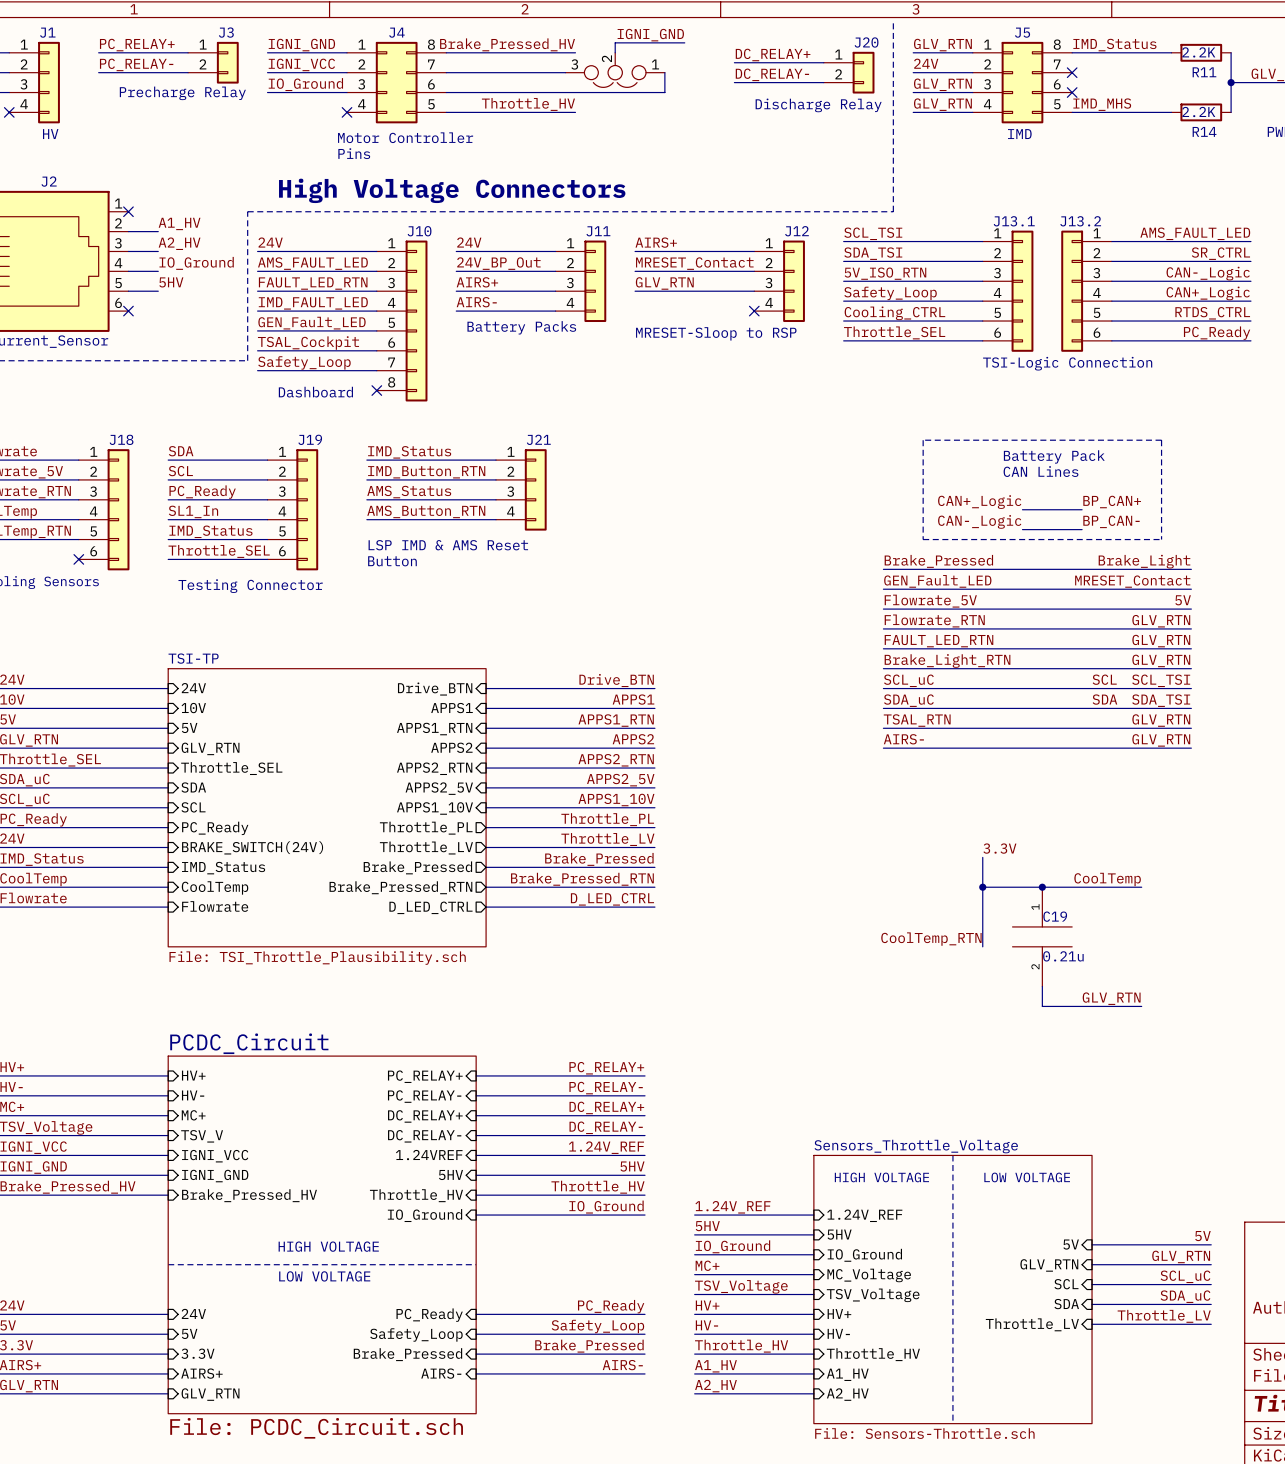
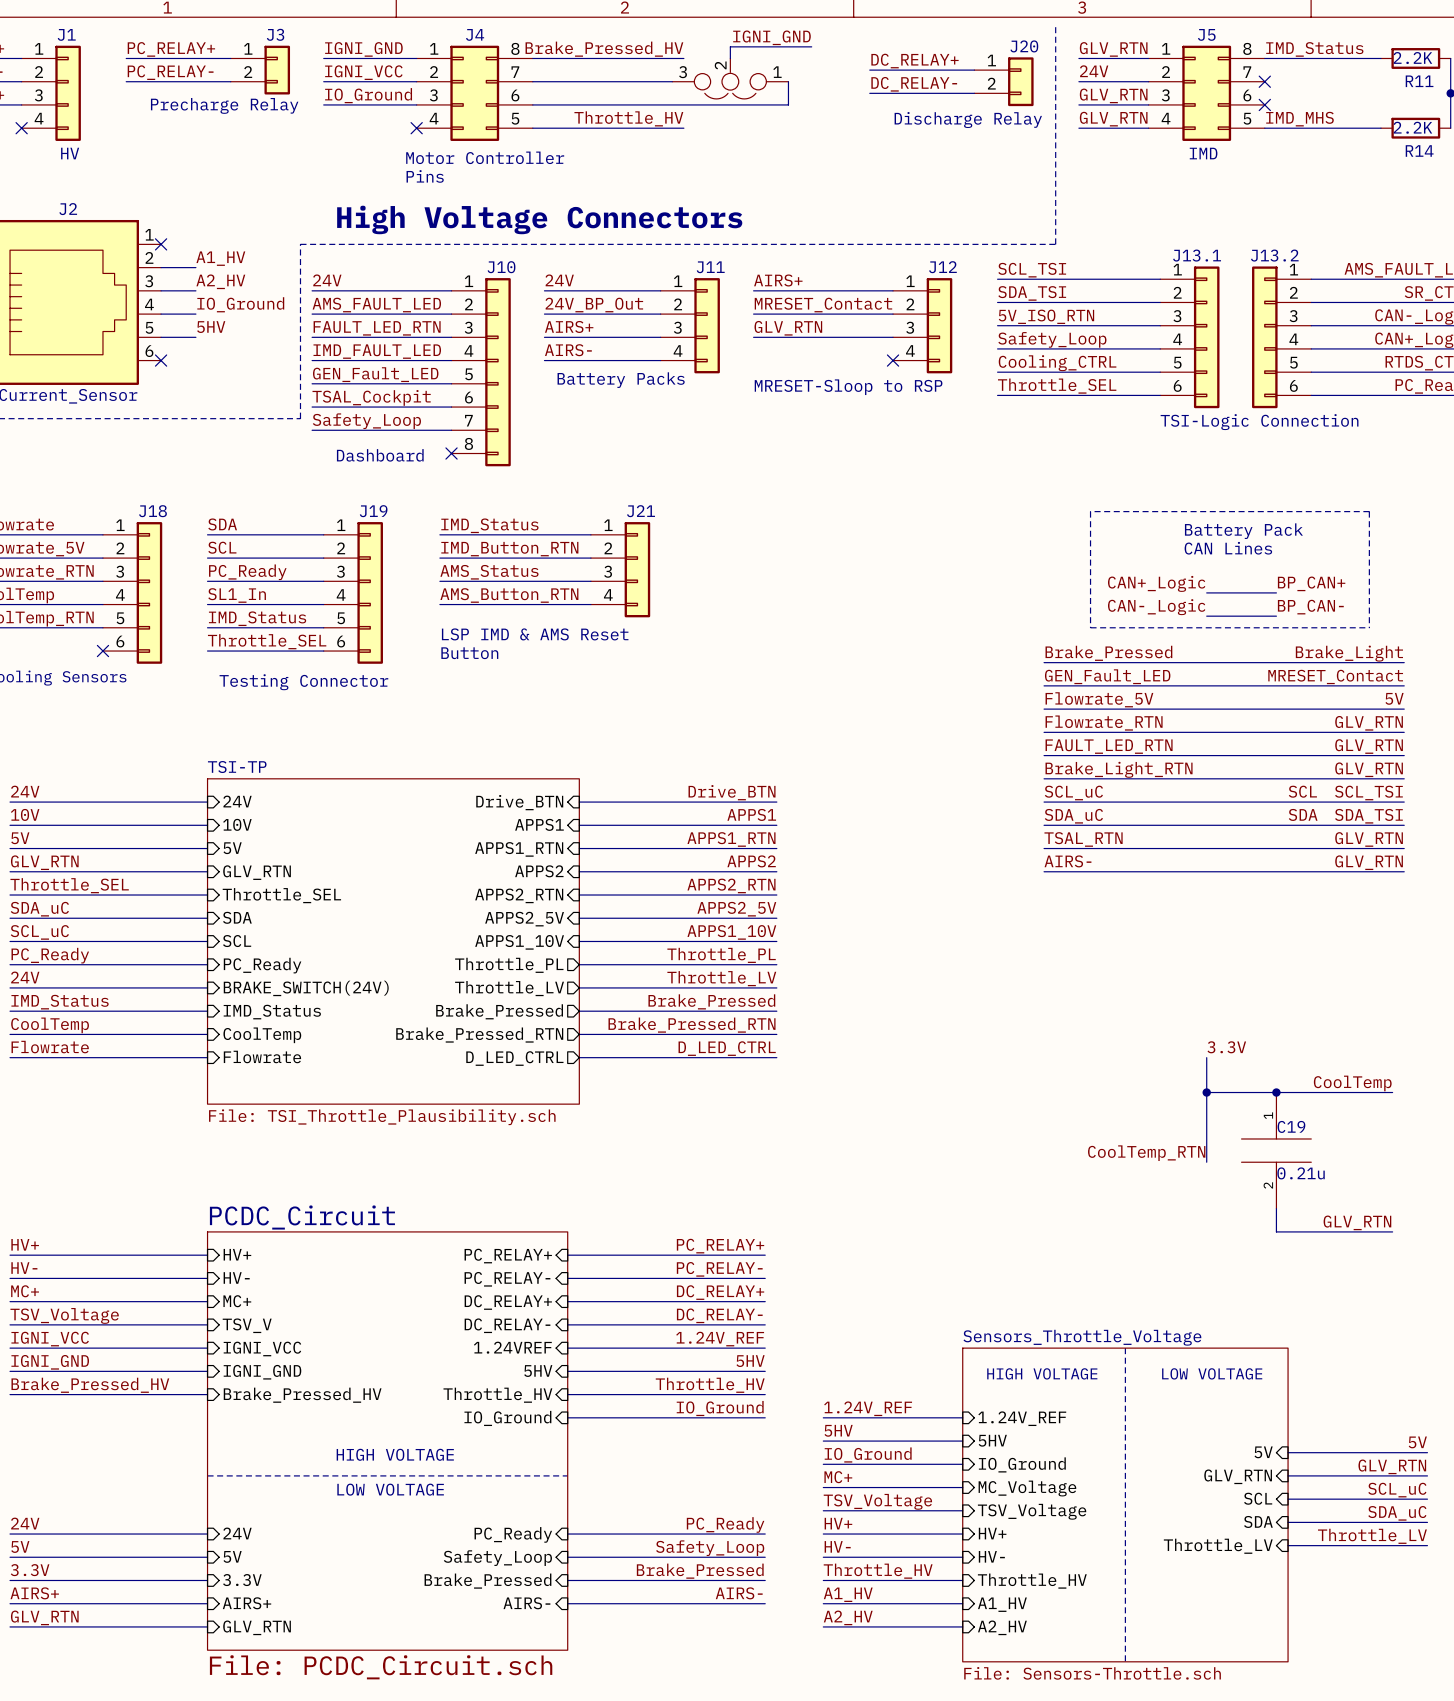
label position: 3.3V (999, 848) -> 3.3V (1226, 1047)
wire: (982, 857) (982, 946) -> (1206, 1057) (1206, 1162)
label position: CoolTemp (1107, 879) -> CoolTemp (1352, 1083)
wire: (982, 887) (1141, 887) -> (1206, 1092) (1392, 1092)
junction: (982, 887) -> none
junction: (1042, 887) -> none
junction: none -> (1206, 1092)
C19 position: (1042, 936) -> (1276, 1150)
junction: none -> (1276, 1092)
label position: CoolTemp_RTN (931, 939) -> CoolTemp_RTN (1146, 1153)
wire: (1042, 986) (1042, 1006) (1141, 1006) -> (1276, 1208) (1276, 1231) (1392, 1231)
label position: GLV_RTN (1111, 998) -> GLV_RTN (1357, 1222)

